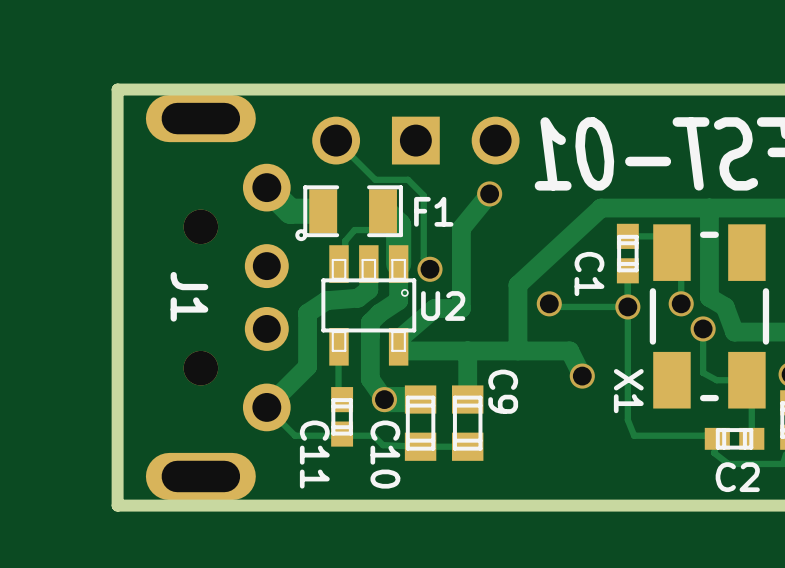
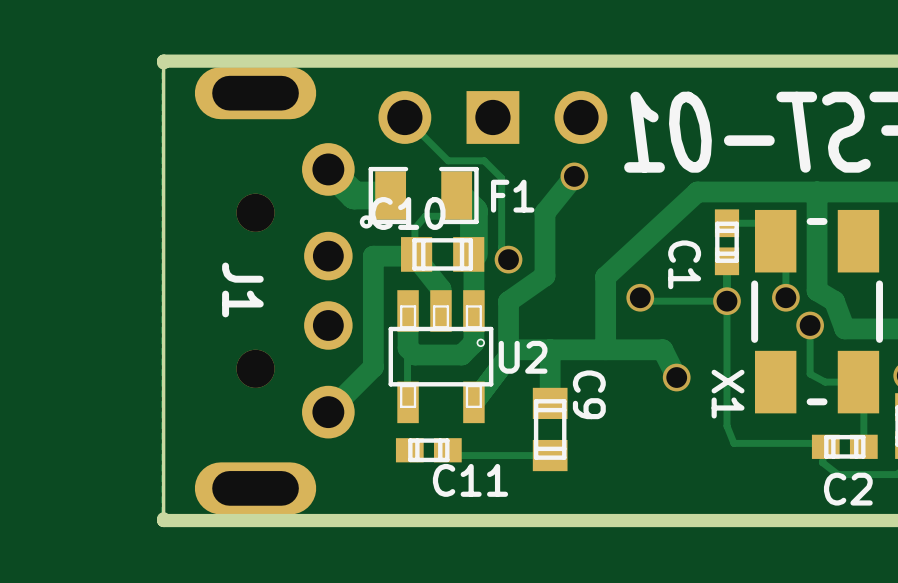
board edge width: thick (117, 91) (117, 504) -> thin (163, 62) (163, 518)
track: (489, 193) (461, 228) (461, 308) (434, 308) (401, 336) (398, 346) (400, 350) (434, 350) -> (574, 176) (544, 212) (544, 275) (508, 301) (508, 356) (473, 402) (513, 349)
track: (368, 264) (368, 289) (358, 298) (326, 300) (307, 313) -> (440, 310) (440, 289) (414, 256) (373, 256) (373, 308)
track: (398, 300) (379, 313) (370, 322) (370, 379) (384, 399) (420, 399) -> (473, 294) (473, 342) (461, 354) (415, 354) (408, 348) (408, 310)
U2 position: (368, 305) -> (440, 356)
via: (384, 399) -> none
track: (266, 407) (294, 435) (373, 435) (382, 445) (420, 446) -> (447, 450) (460, 455) (498, 455)
C11 rotation: 0° (342, 416) -> 90° clockwise (428, 450)
C10 rotation: 0° (420, 423) -> 90° clockwise (442, 254)
C10 position: (420, 423) -> (442, 254)
C11 name position: C11 (314, 454) -> C11 (470, 480)

